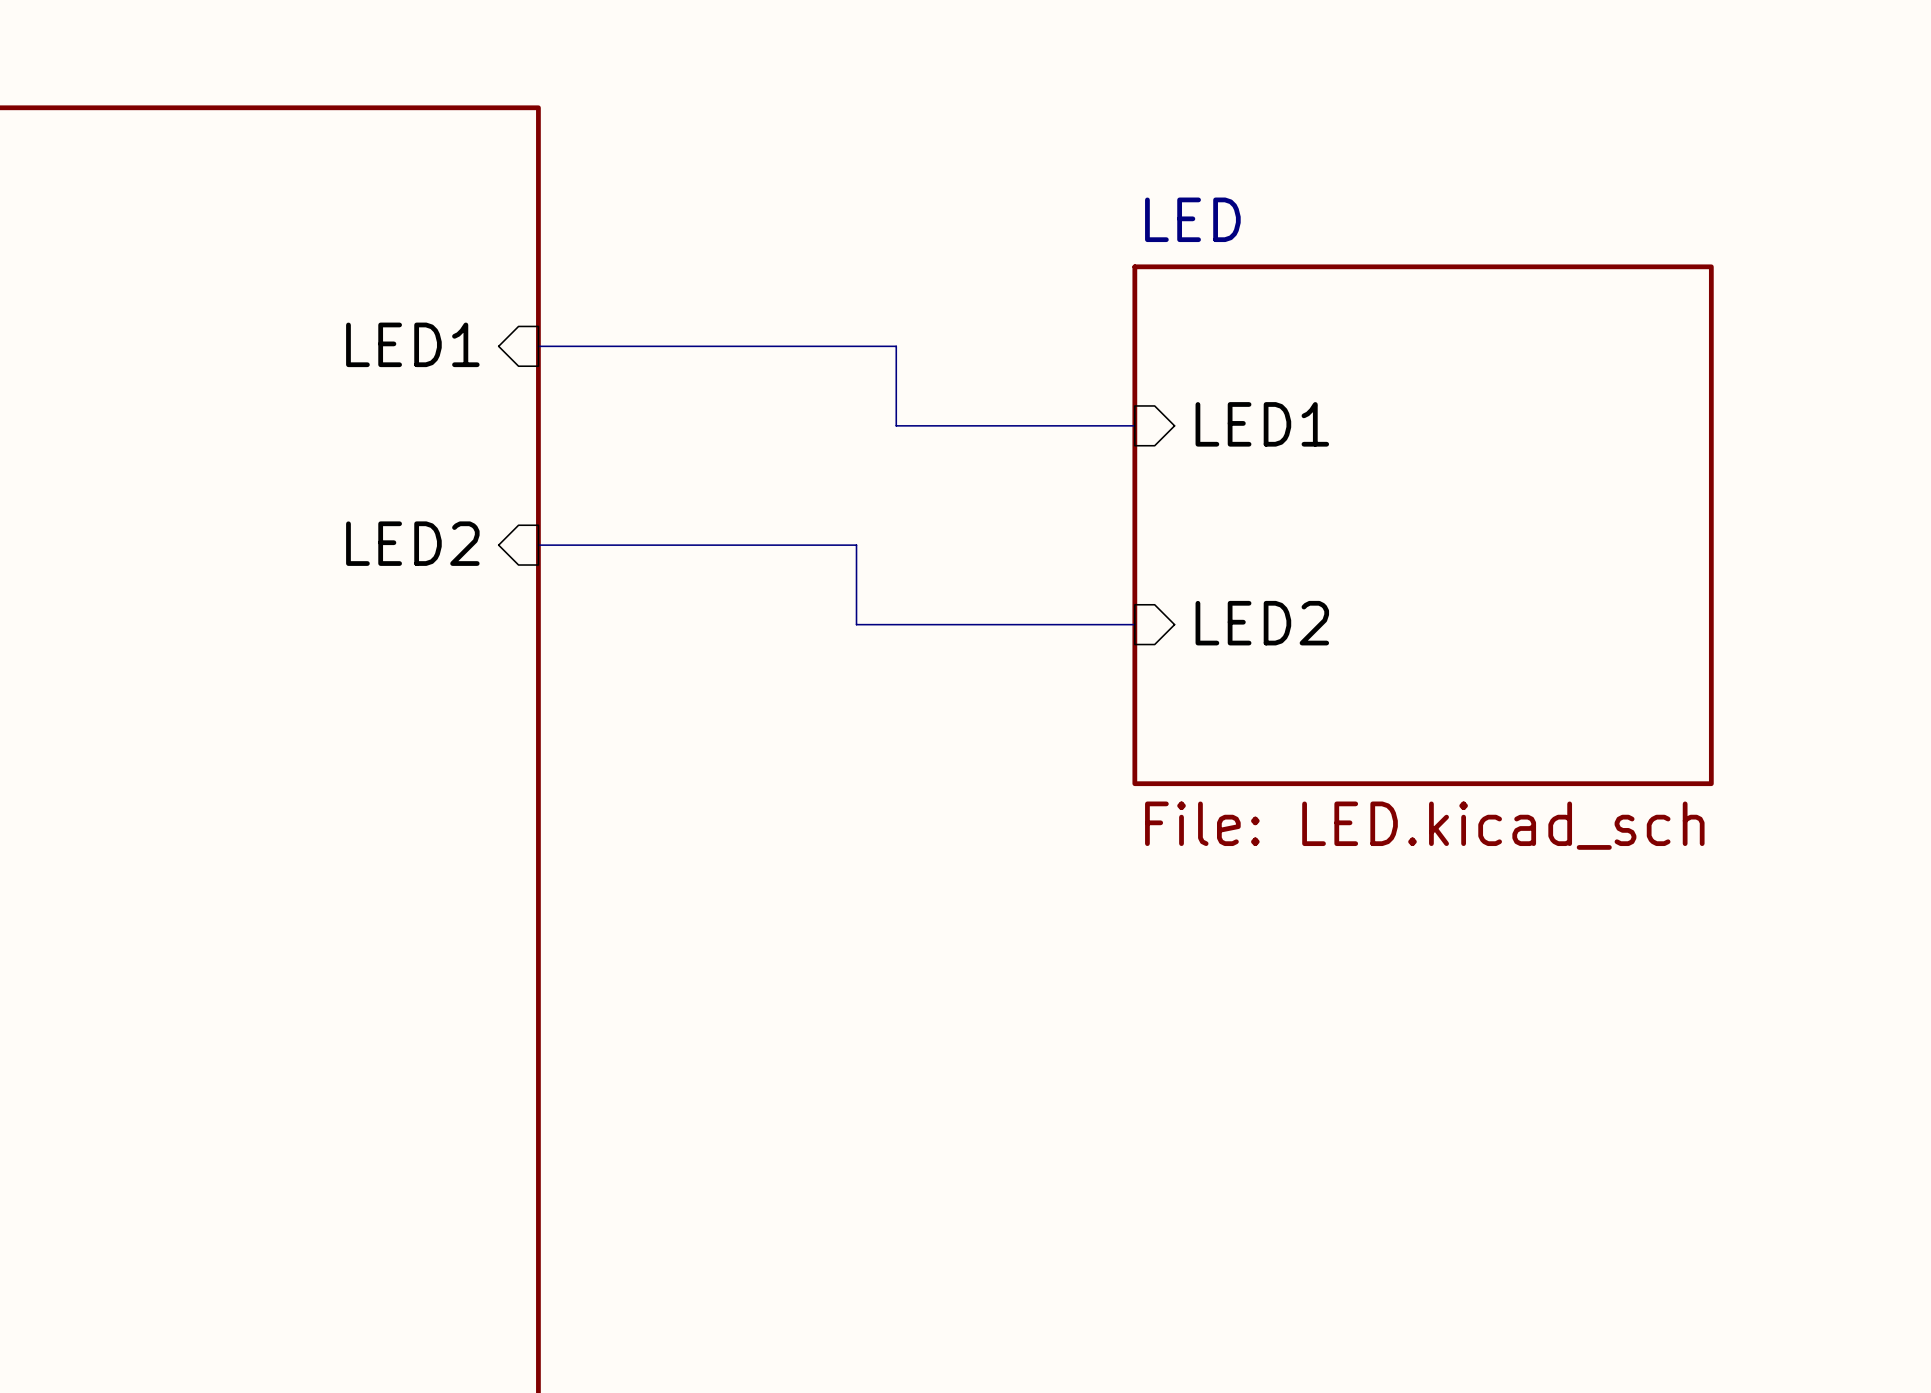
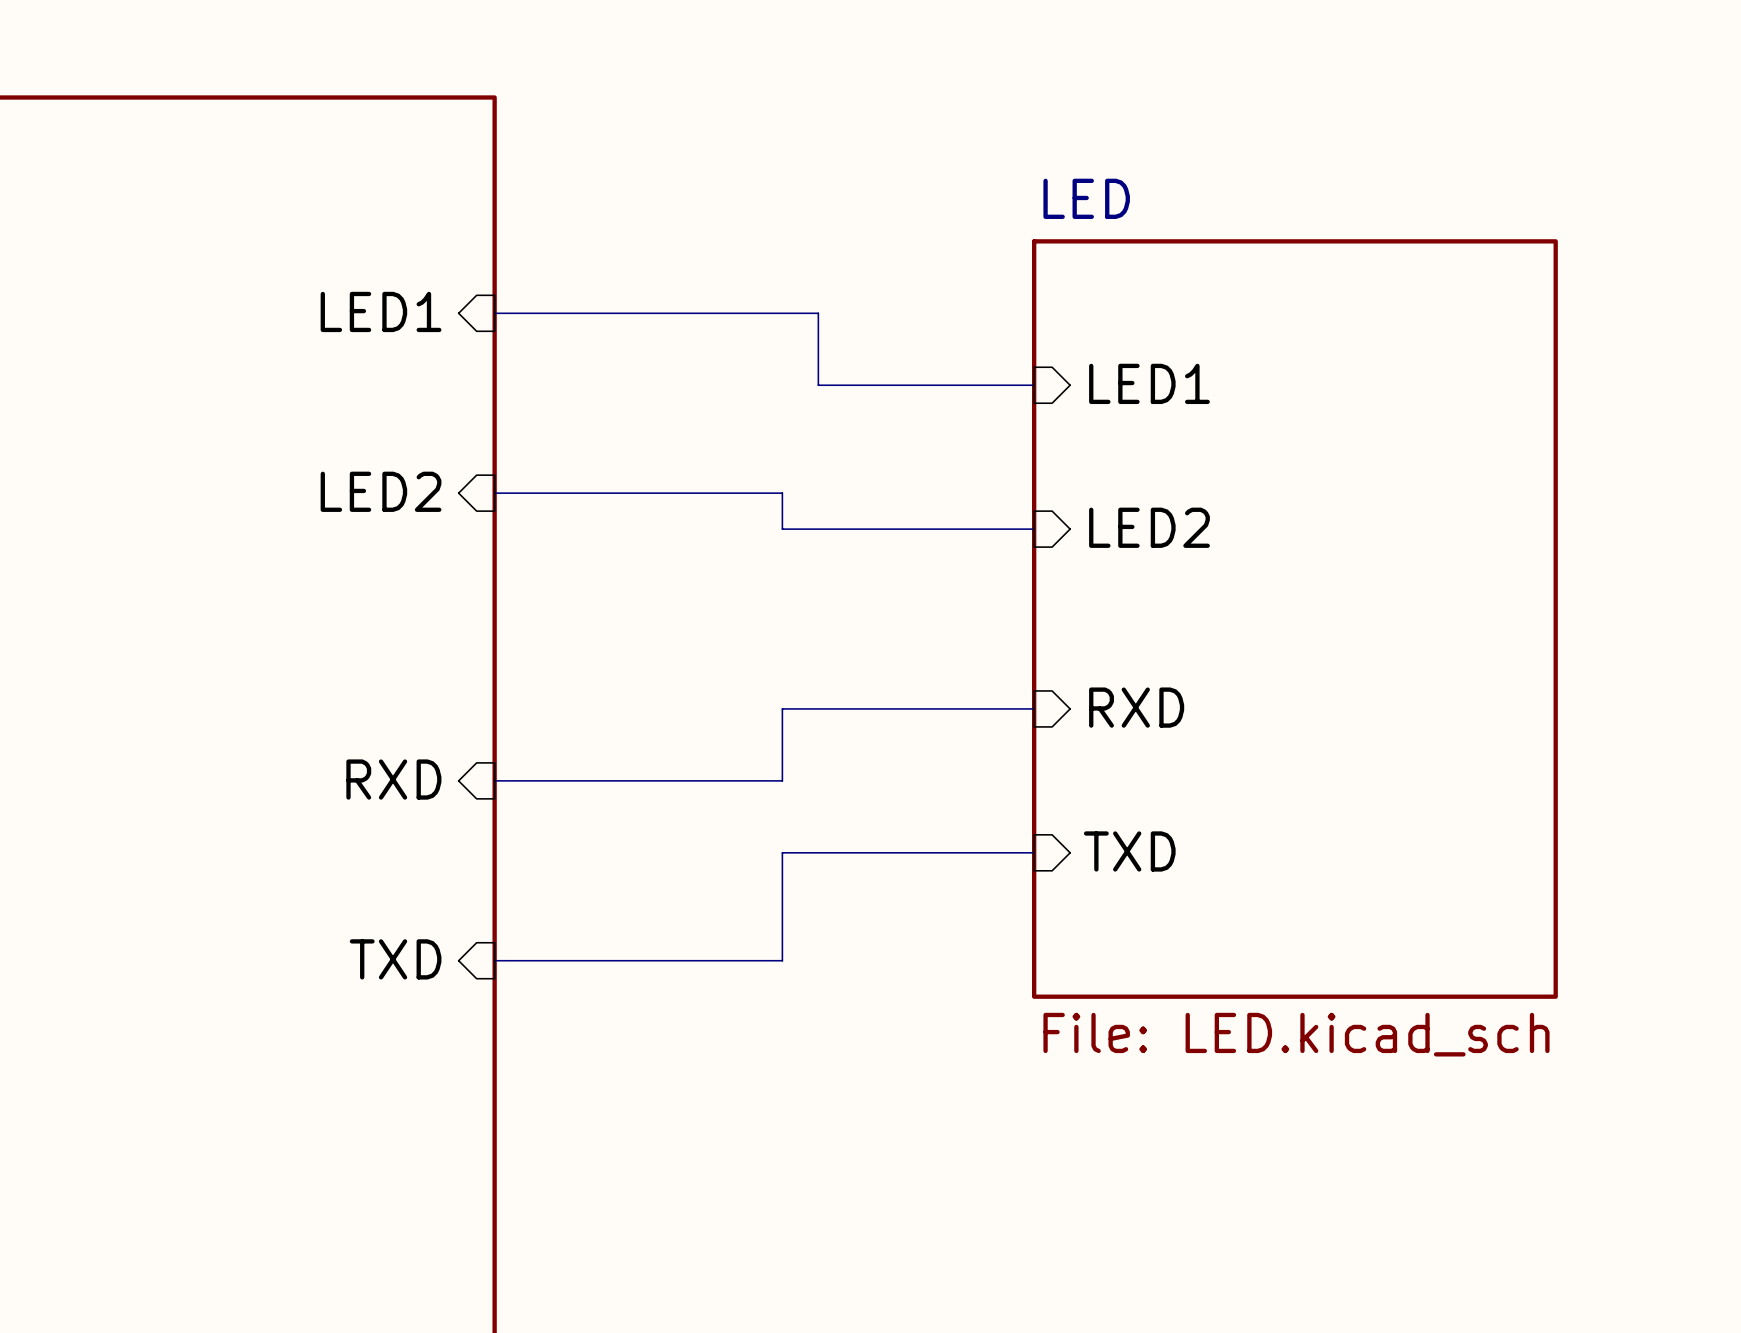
sheet LED: File: LED.kicad_sch (1423, 525) -> none
wire: (856, 584) (856, 624) (1134, 624) -> (782, 529) (1034, 529)
sheet pin position: LED2 (1262, 623) -> LED2 (1149, 527)
sheet LED: none -> File: LED.kicad_sch (1294, 619)
sheet pin: none -> RXD (1136, 707)
wire: none -> (1034, 708) (782, 708) (782, 780) (494, 780)
sheet pin: none -> RXD (393, 779)
sheet pin: none -> TXD (1129, 851)
wire: none -> (1034, 852) (782, 852) (782, 960) (494, 960)
sheet pin: none -> TXD (395, 959)

